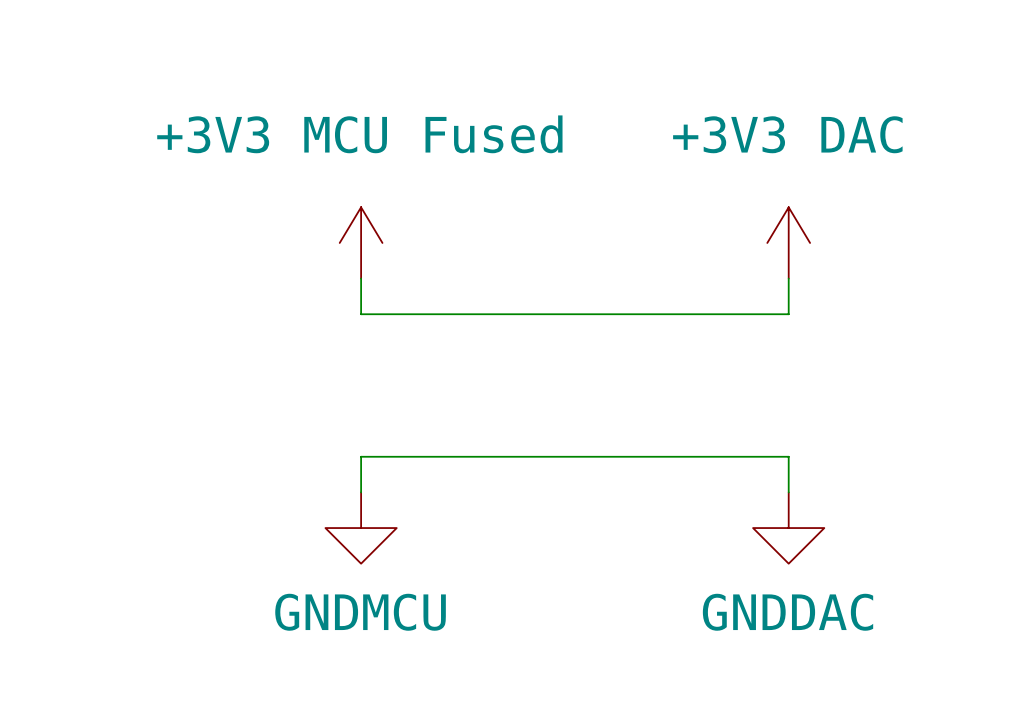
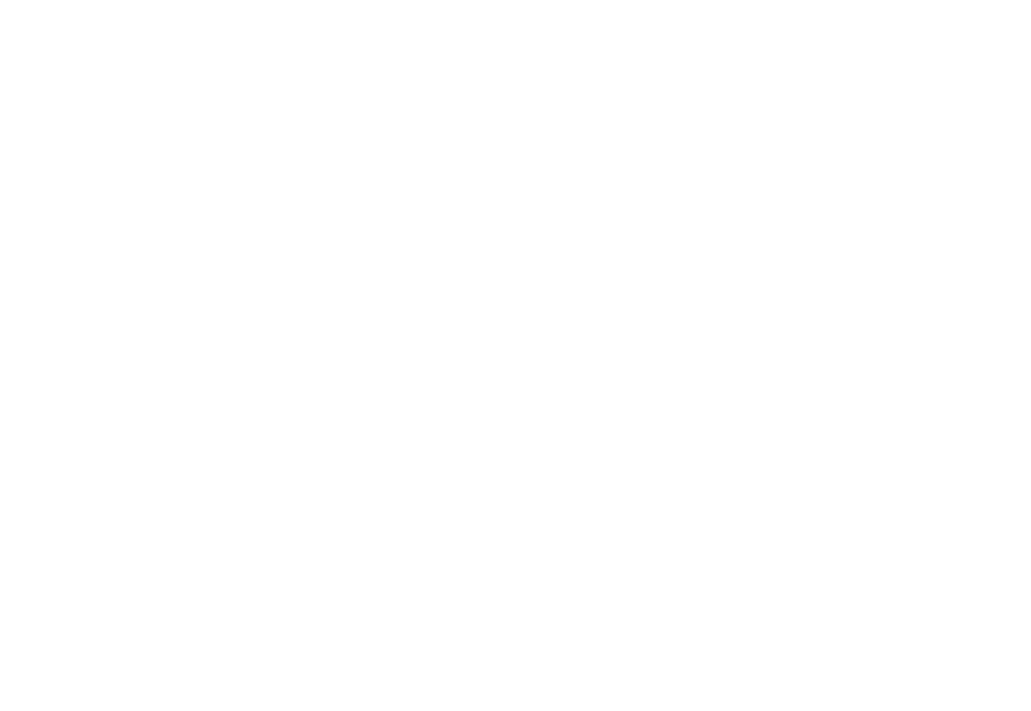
power symbol: +3V3 MCU Fused (361, 242) -> none
power symbol: +3V3 DAC (788, 242) -> none
wire: (361, 278) (361, 314) (788, 314) (788, 278) -> none
wire: (361, 492) (361, 456) (788, 456) (788, 492) -> none
power symbol: GNDMCU (361, 528) -> none
power symbol: GNDDAC (788, 528) -> none

